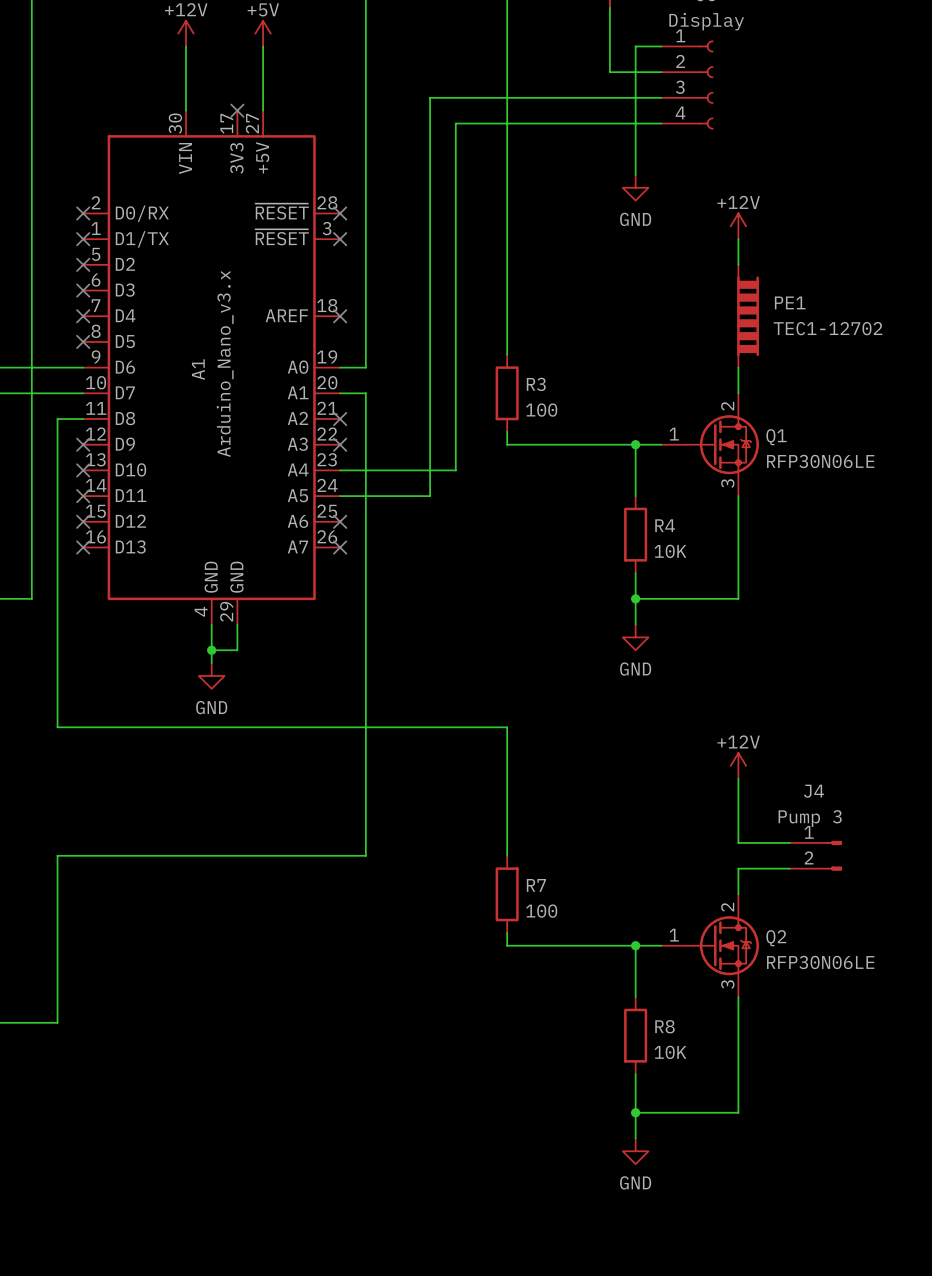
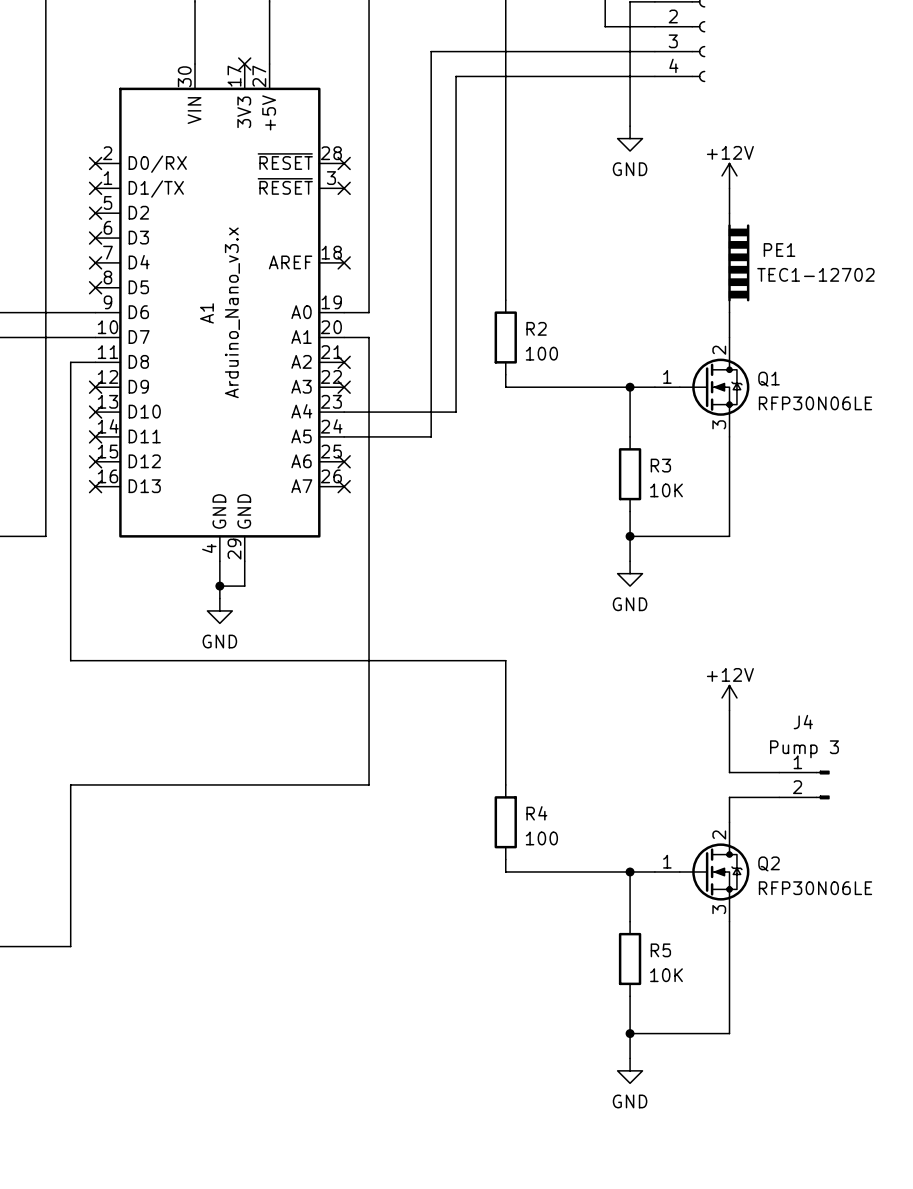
R3 name: R3 (536, 384) -> R2 (536, 328)
R4 name: R4 (665, 525) -> R3 (660, 465)
R7 name: R7 (536, 885) -> R4 (536, 813)
R8 name: R8 (664, 1026) -> R5 (660, 950)

